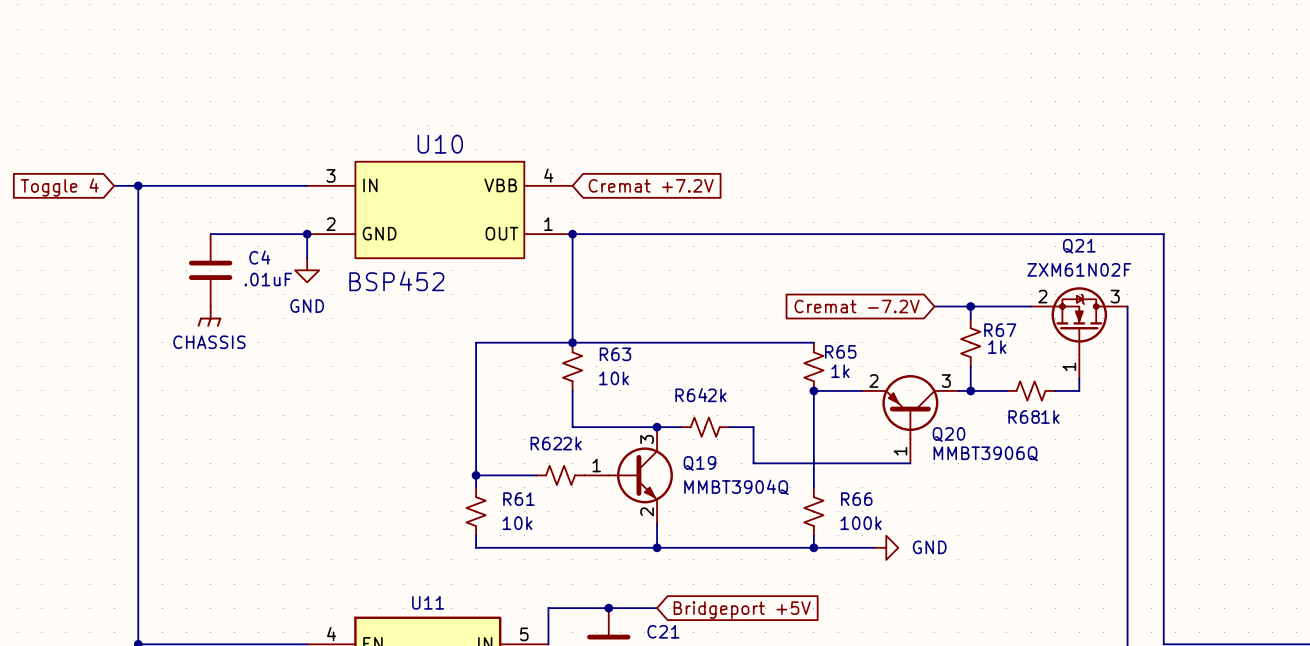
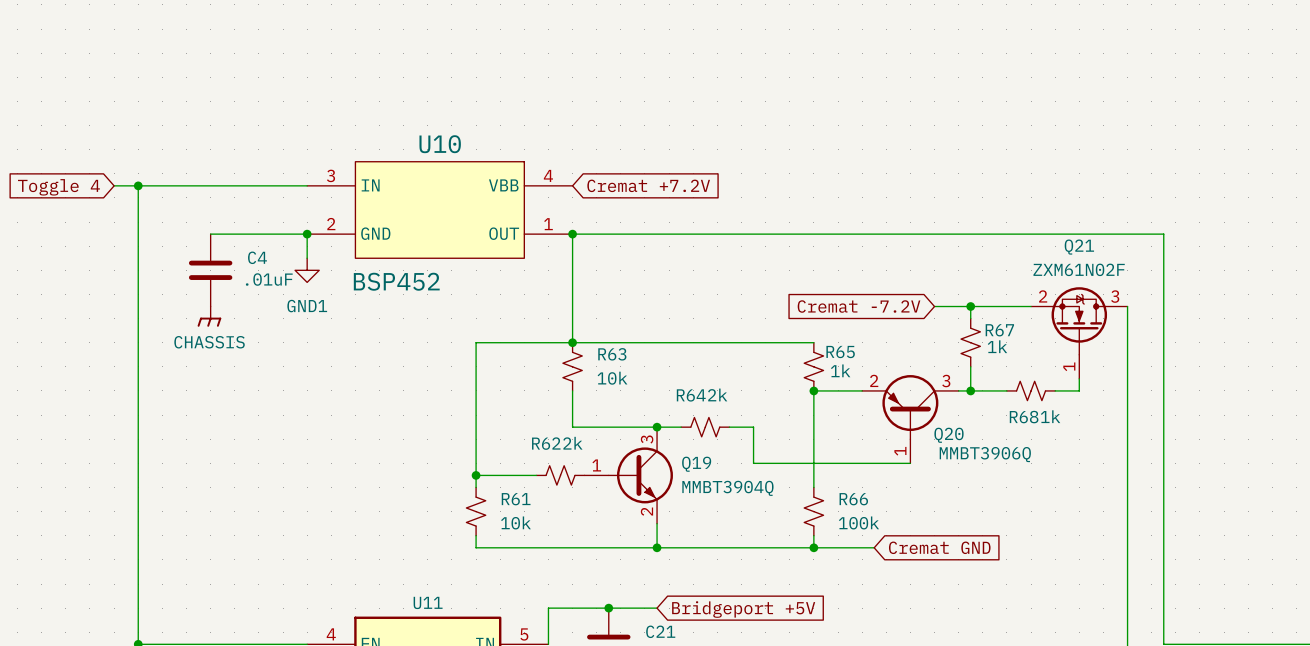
power symbol: GND (307, 270) -> GND1 (307, 270)
power symbol: GND (886, 547) -> none
global label: none -> Cremat GND (939, 547)

